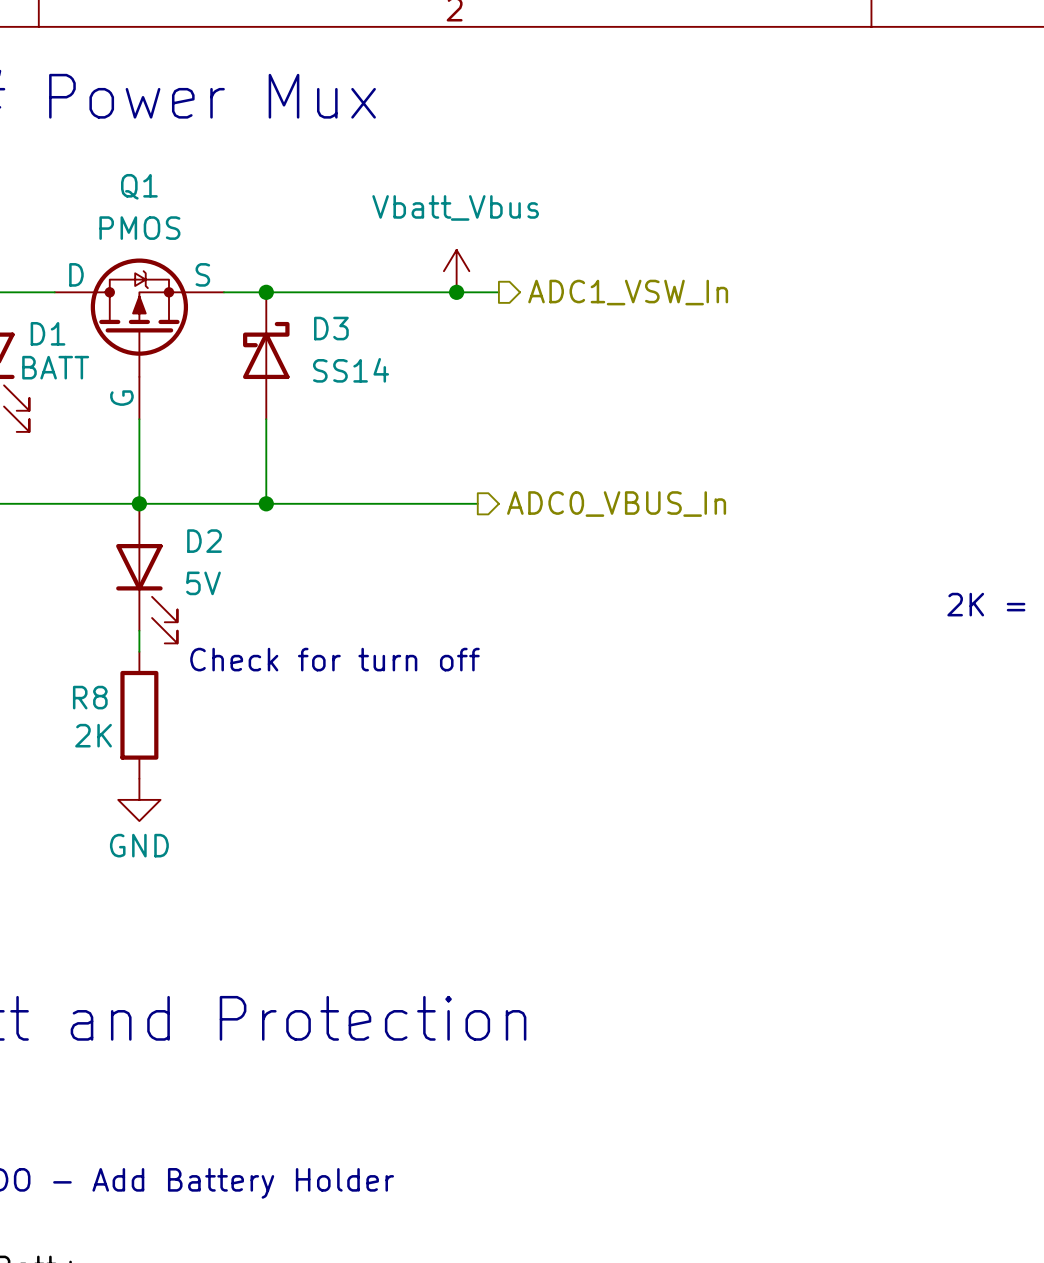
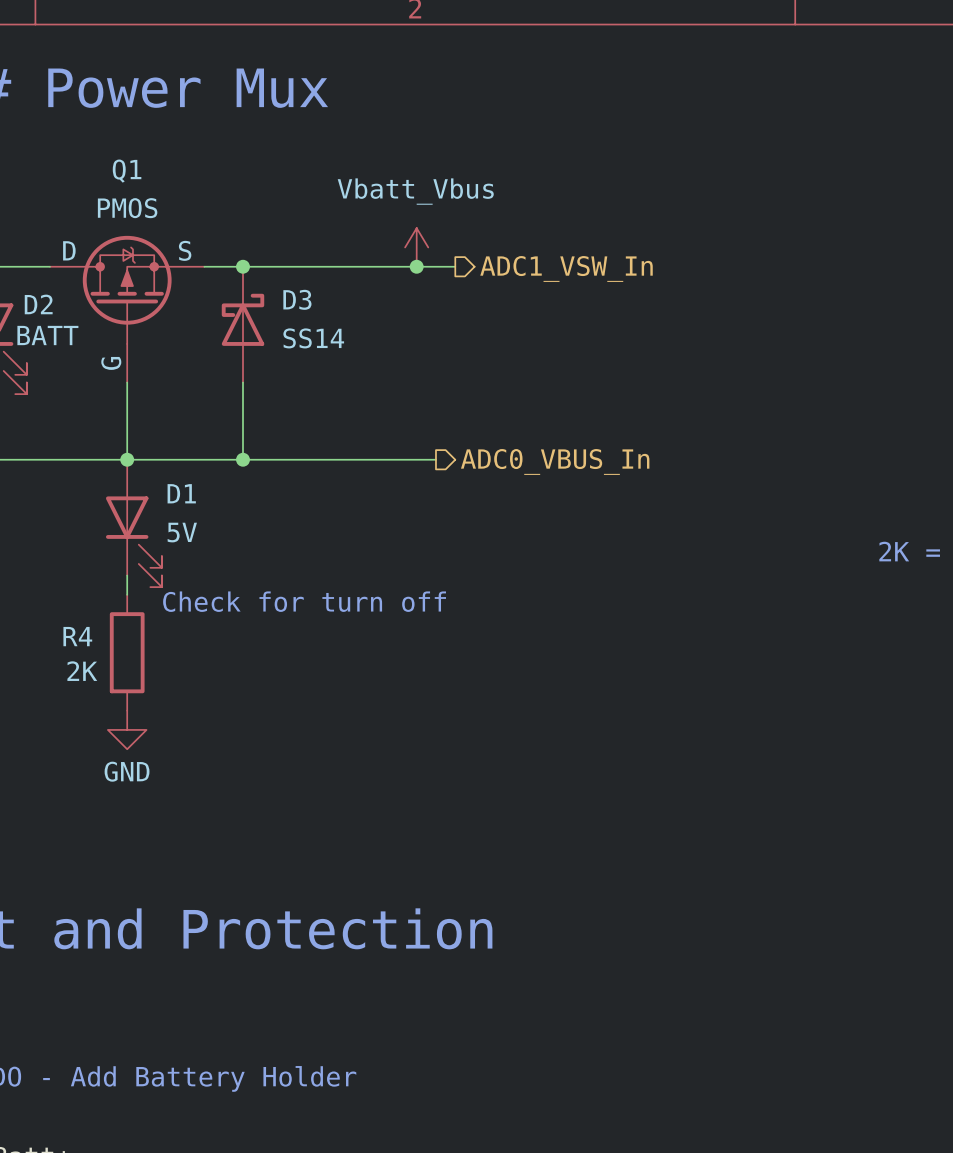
D1 name: D1 (48, 333) -> D2 (38, 304)
D2 name: D2 (204, 541) -> D1 (181, 493)
R8 name: R8 (90, 697) -> R4 (77, 636)

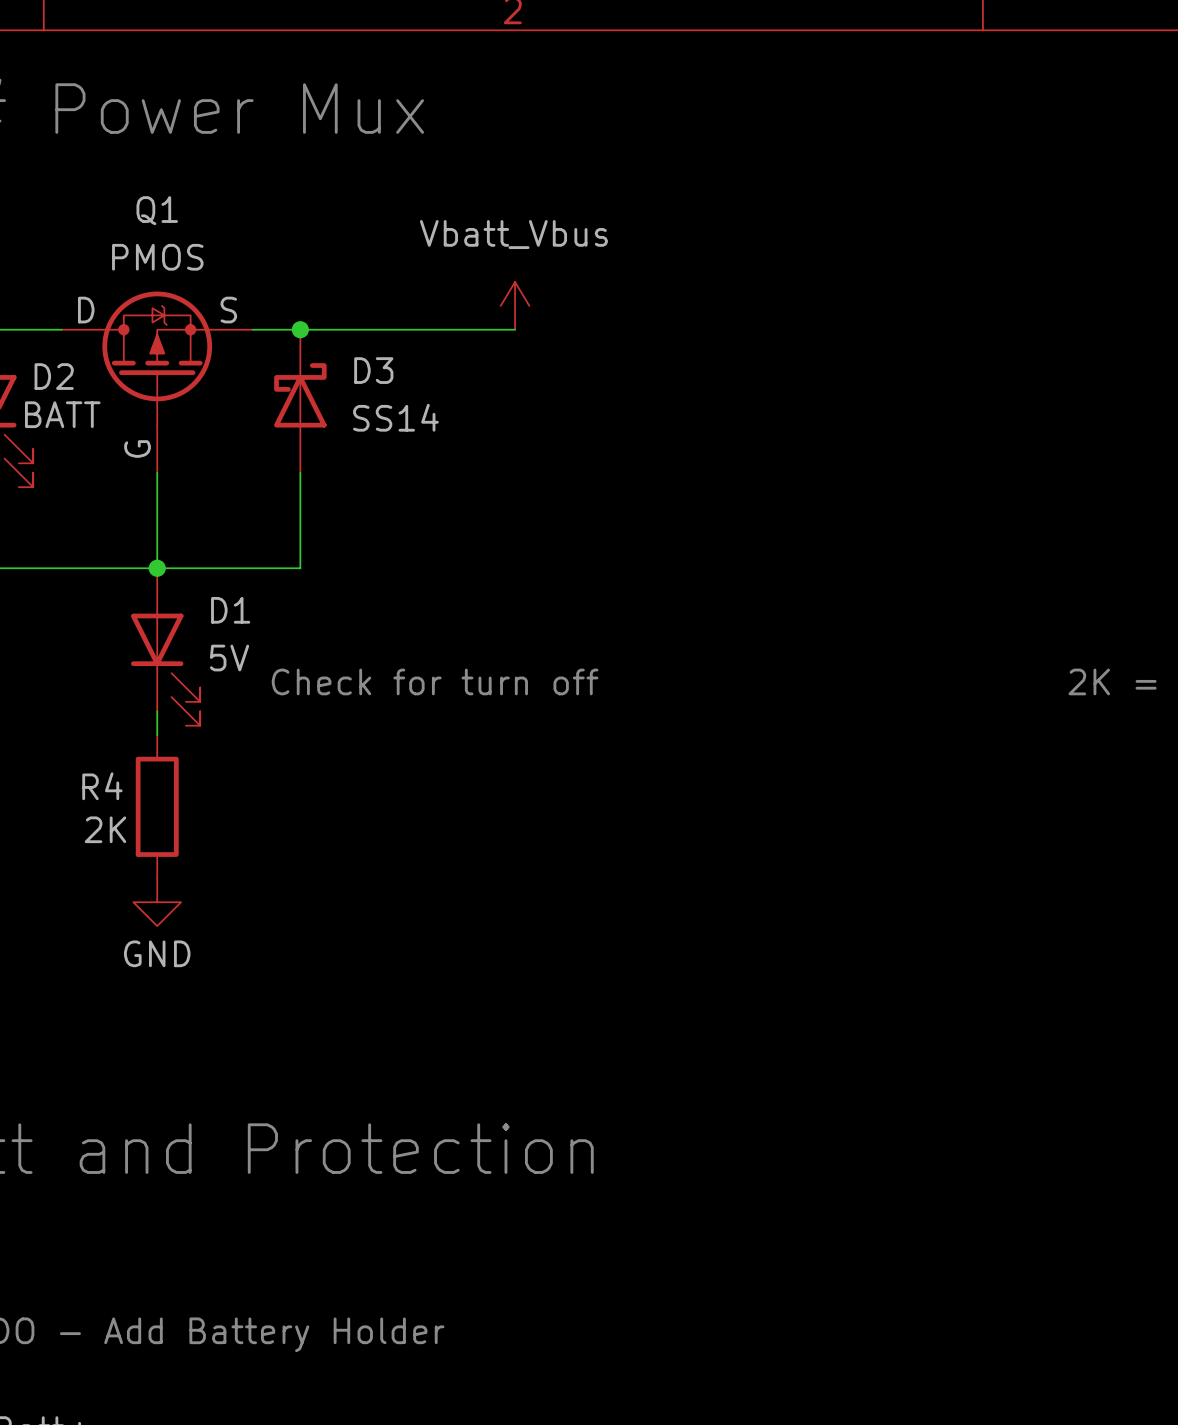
wire: (416, 266) (455, 266) -> none
junction: (416, 266) -> none
hierarchical label: ADC1_VSW_In (566, 268) -> none
wire: (242, 459) (435, 459) -> none
junction: (242, 459) -> none
hierarchical label: ADC0_VBUS_In (555, 461) -> none
text position: Check for turn off (304, 601) -> Check for turn off (435, 681)

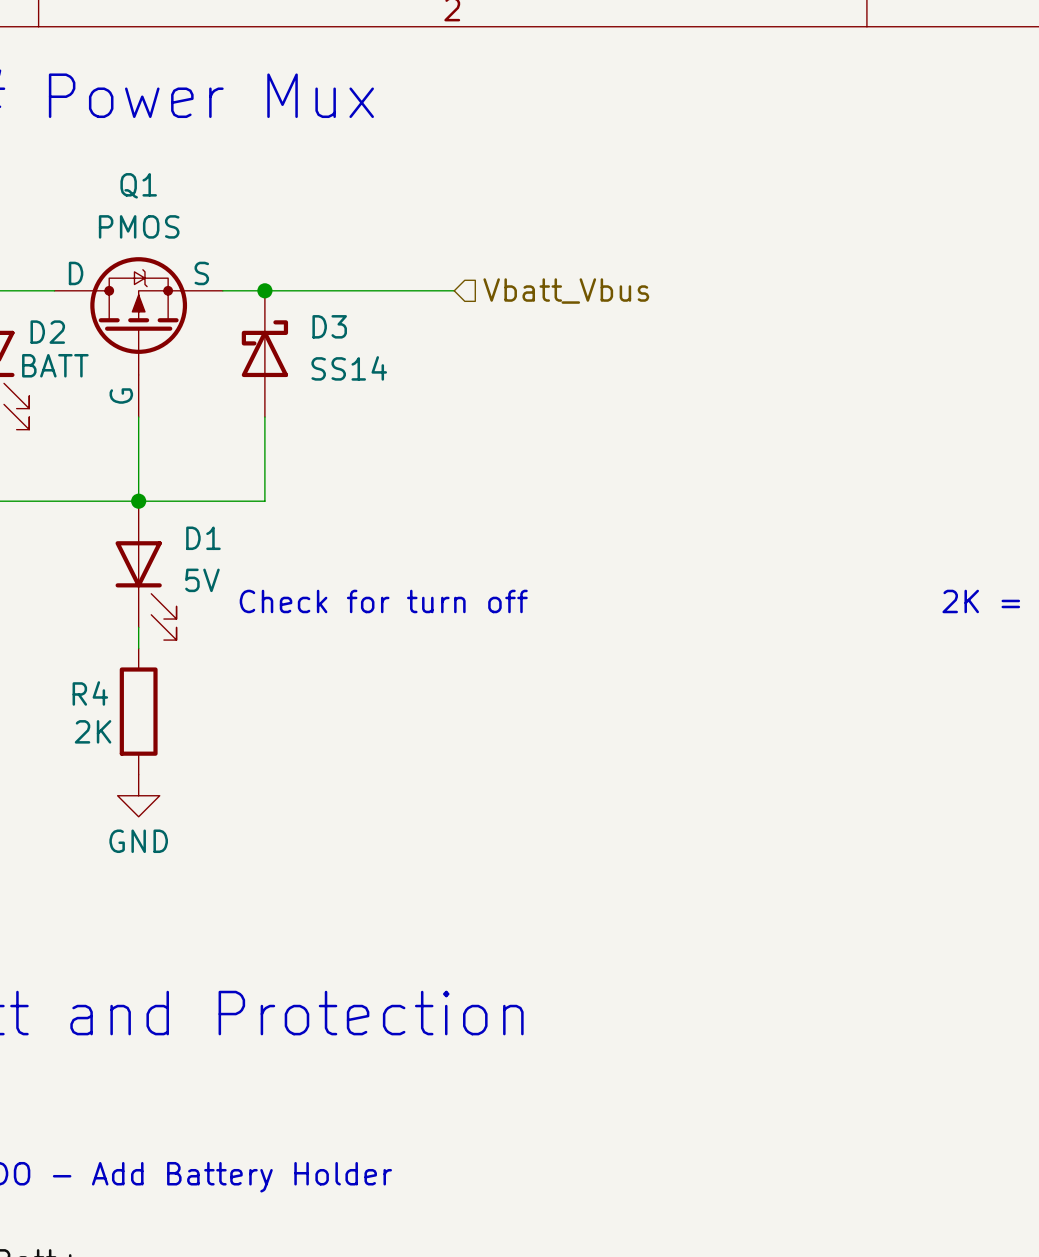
power symbol: Vbatt_Vbus (515, 305) -> none
hierarchical label: none -> Vbatt_Vbus (566, 291)

